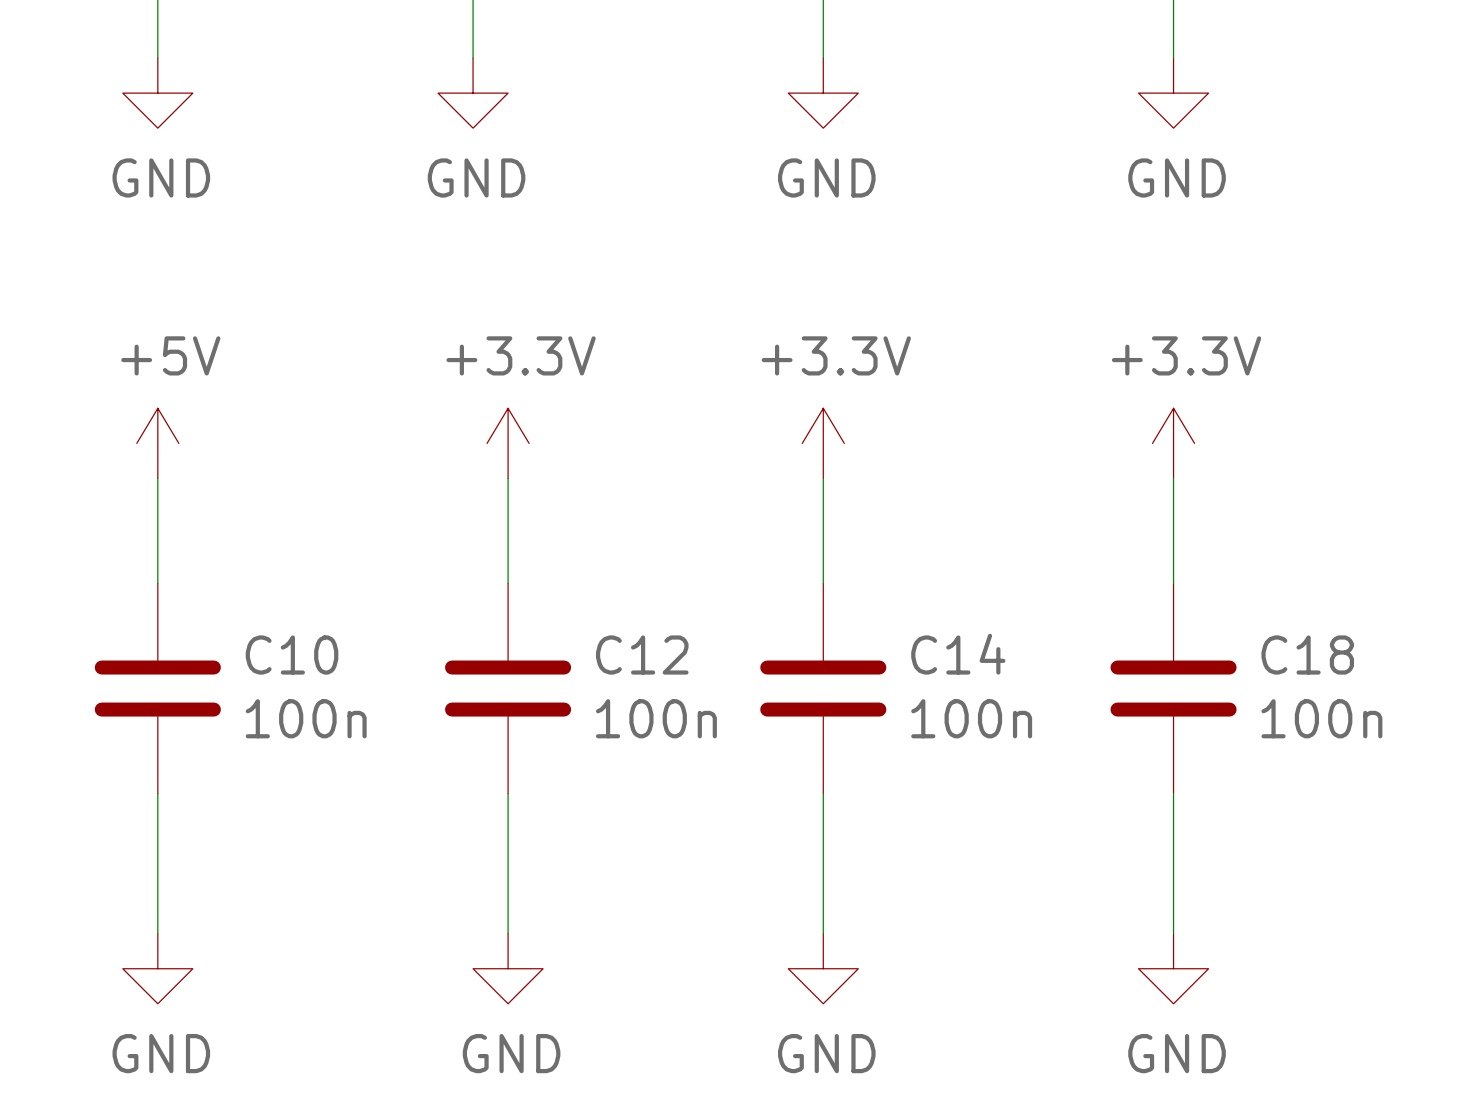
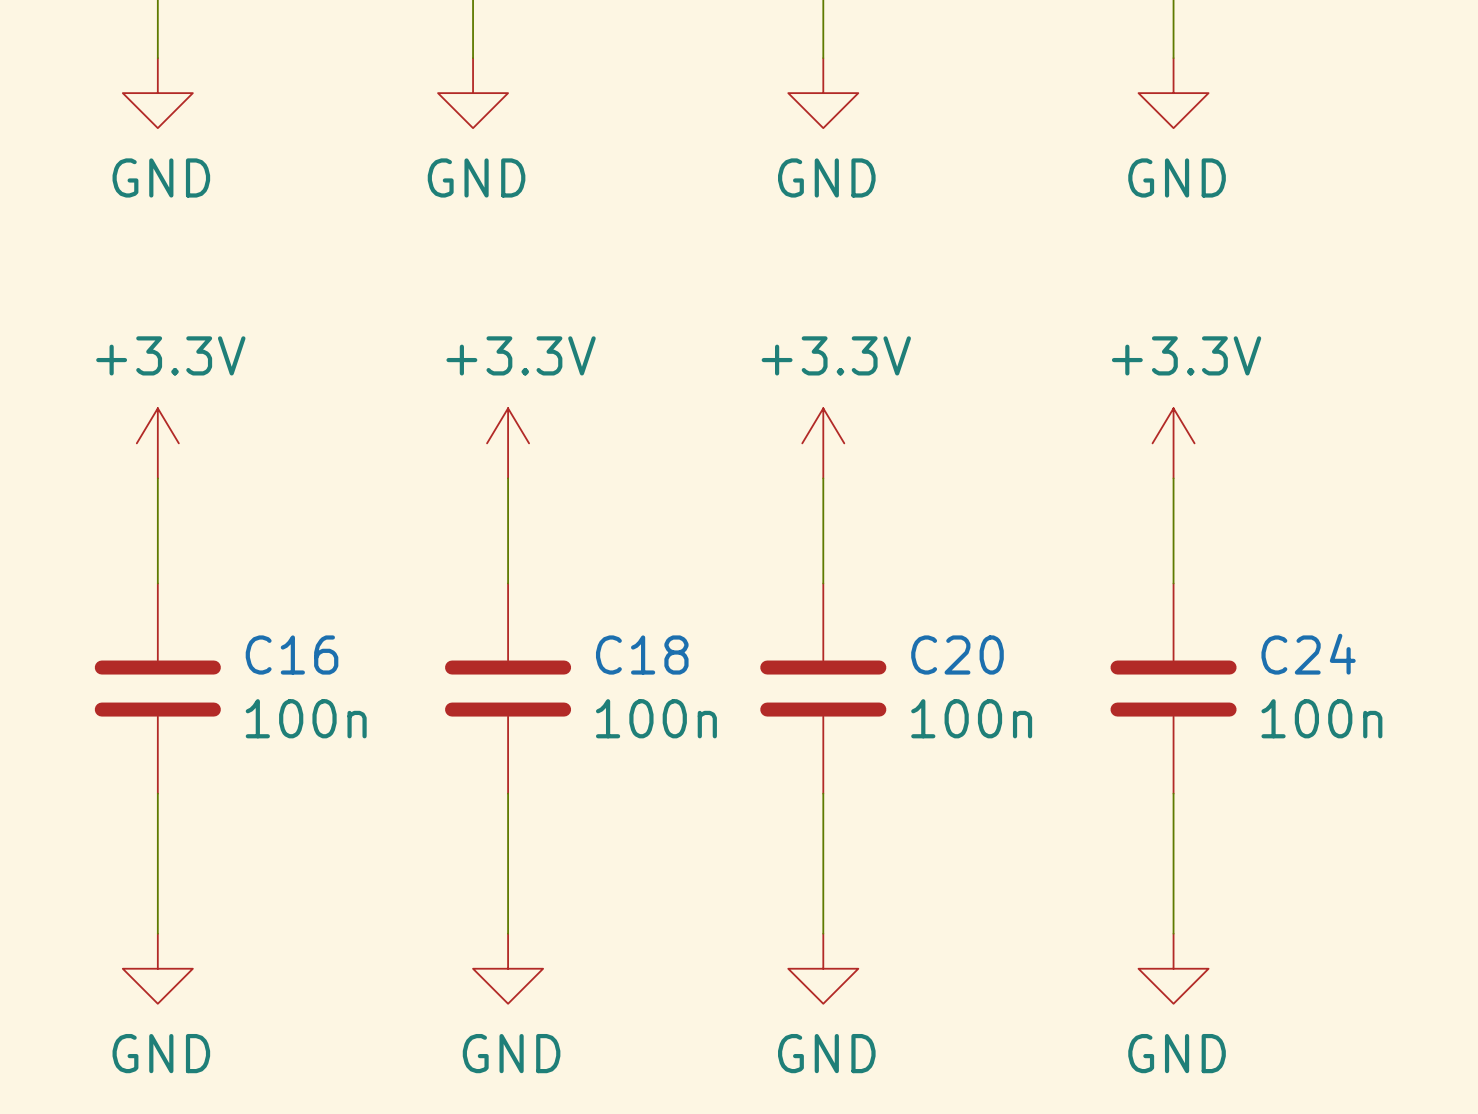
power symbol: +5V (157, 443) -> +3.3V (157, 443)
C14 name: C14 (958, 654) -> C20 (957, 655)
C10 name: C10 (292, 655) -> C16 (292, 655)
C12 name: C12 (642, 655) -> C18 (642, 655)
C18 name: C18 (1307, 655) -> C24 (1308, 654)

